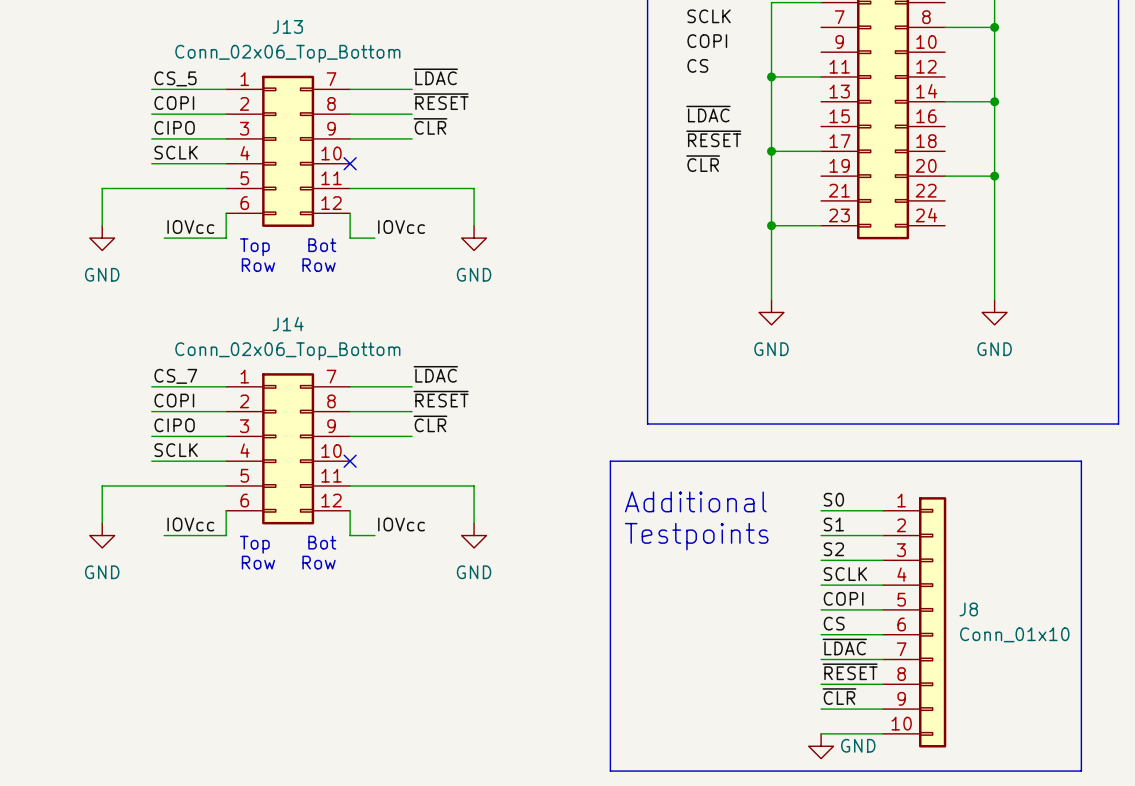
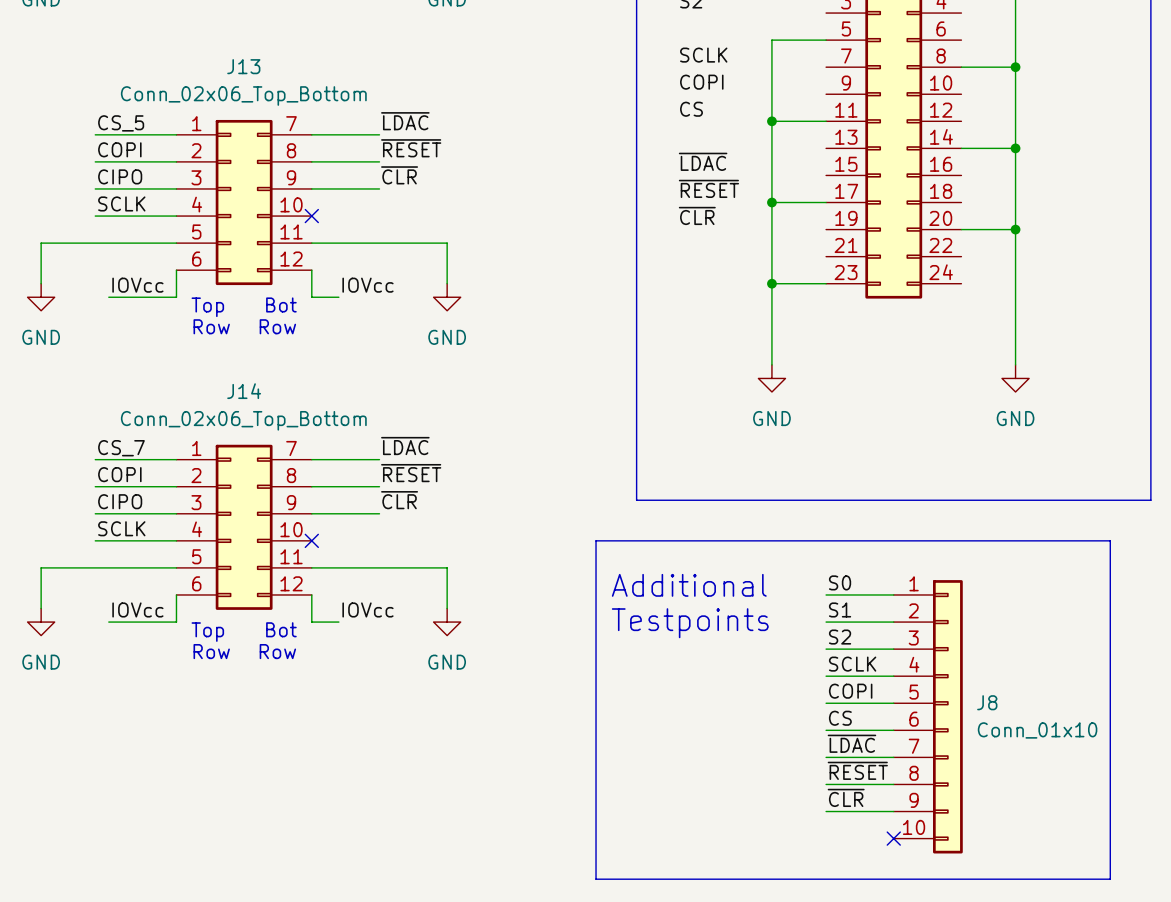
wire: (821, 733) (883, 733) -> none
no-connect mark: none -> (893, 838)
power symbol: GND (821, 746) -> none

